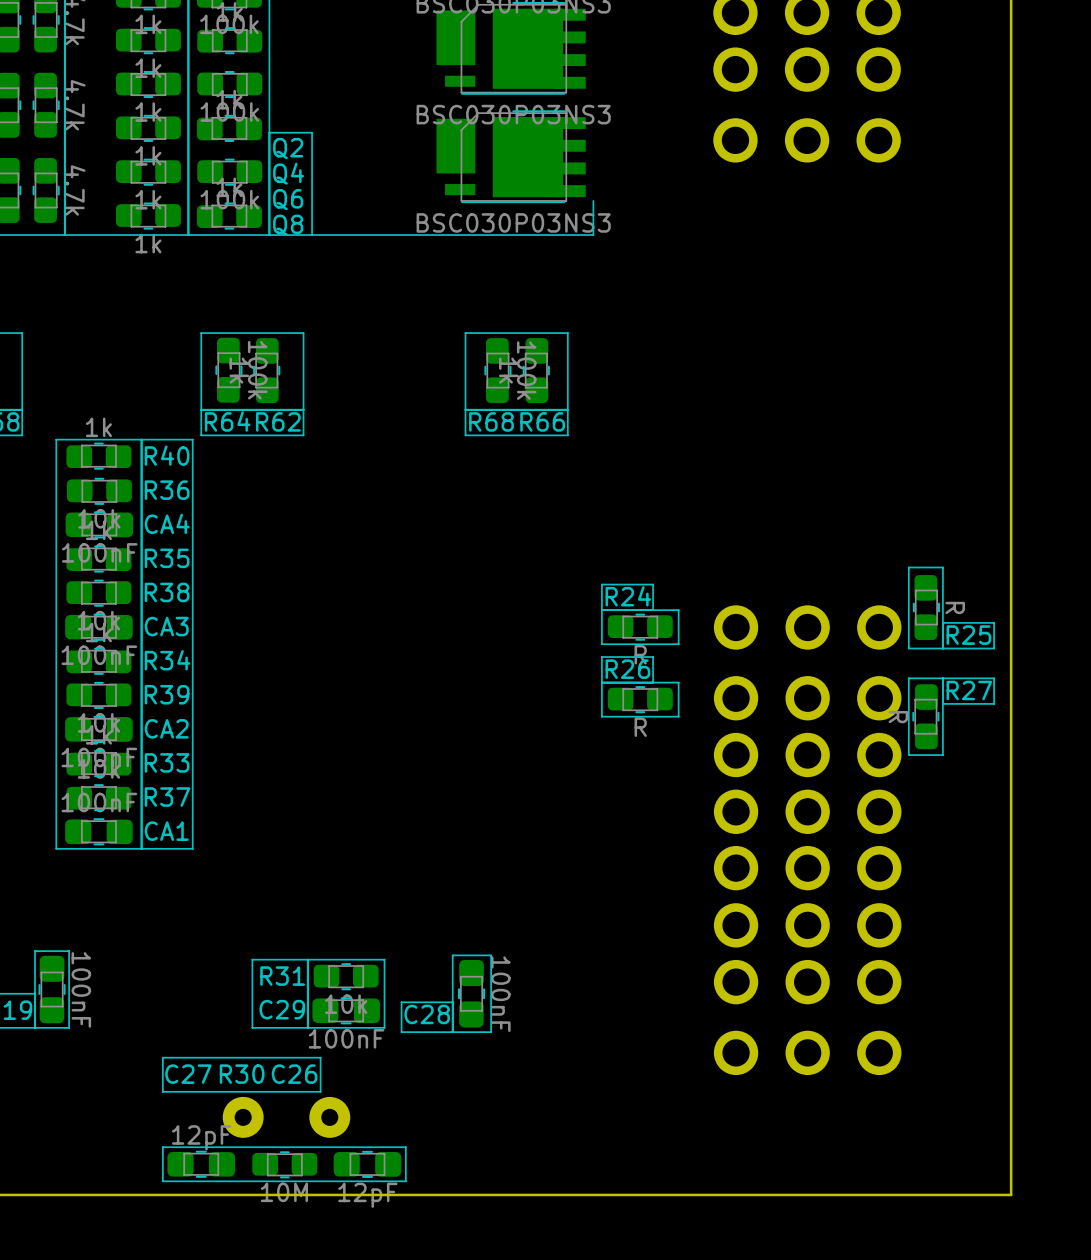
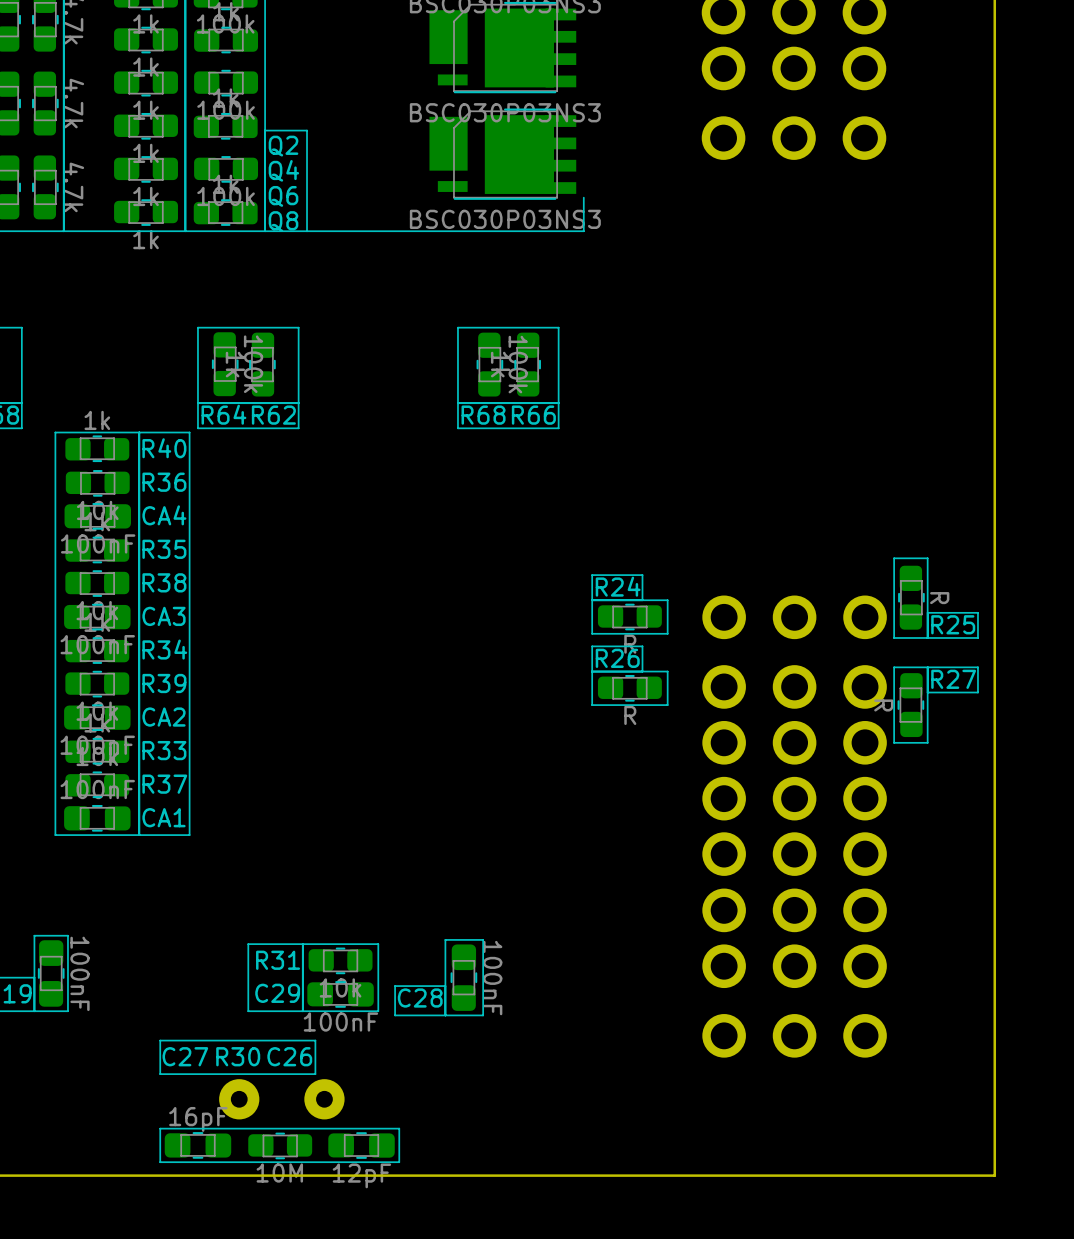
C27 value: 12pF (201, 1137) -> 16pF (198, 1119)

